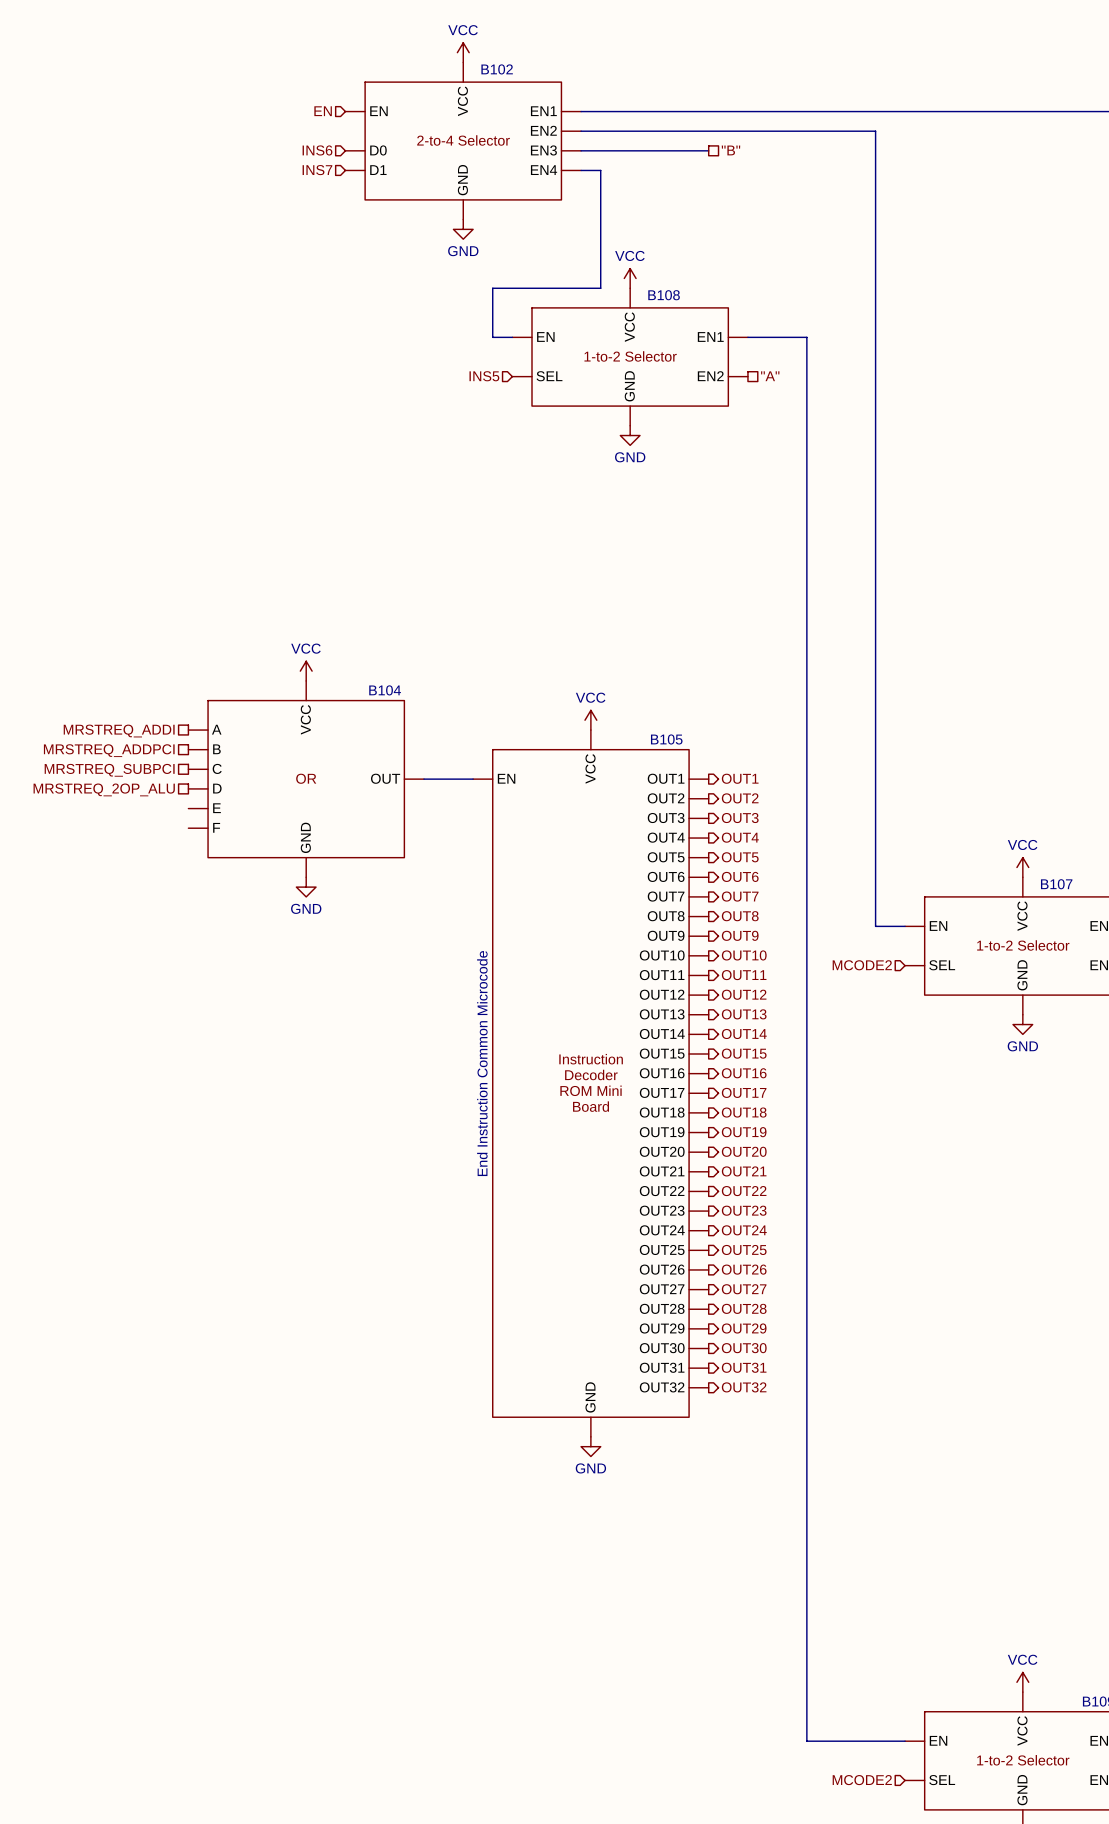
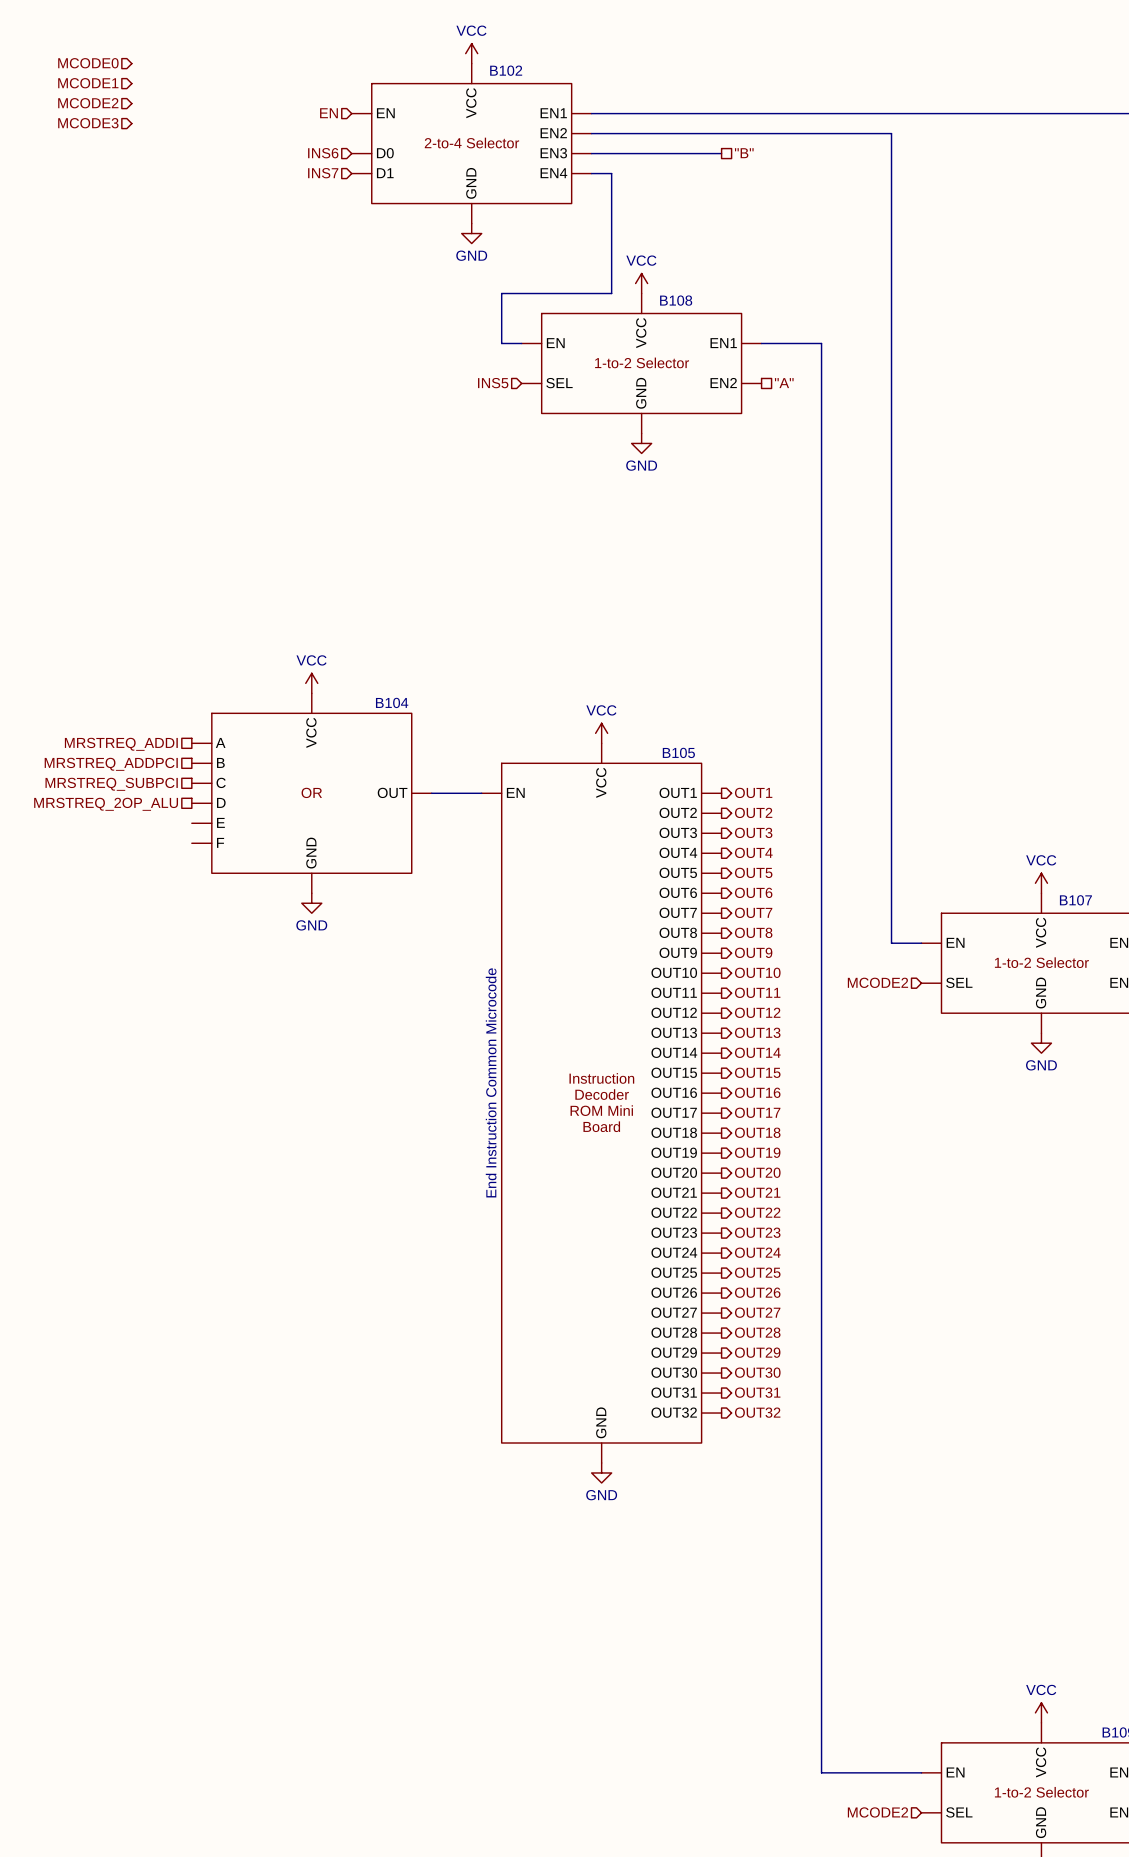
hierarchical label: none -> MCODE0 (88, 63)
hierarchical label: none -> MCODE1 (88, 83)
hierarchical label: none -> MCODE2 (88, 103)
hierarchical label: none -> MCODE3 (88, 123)

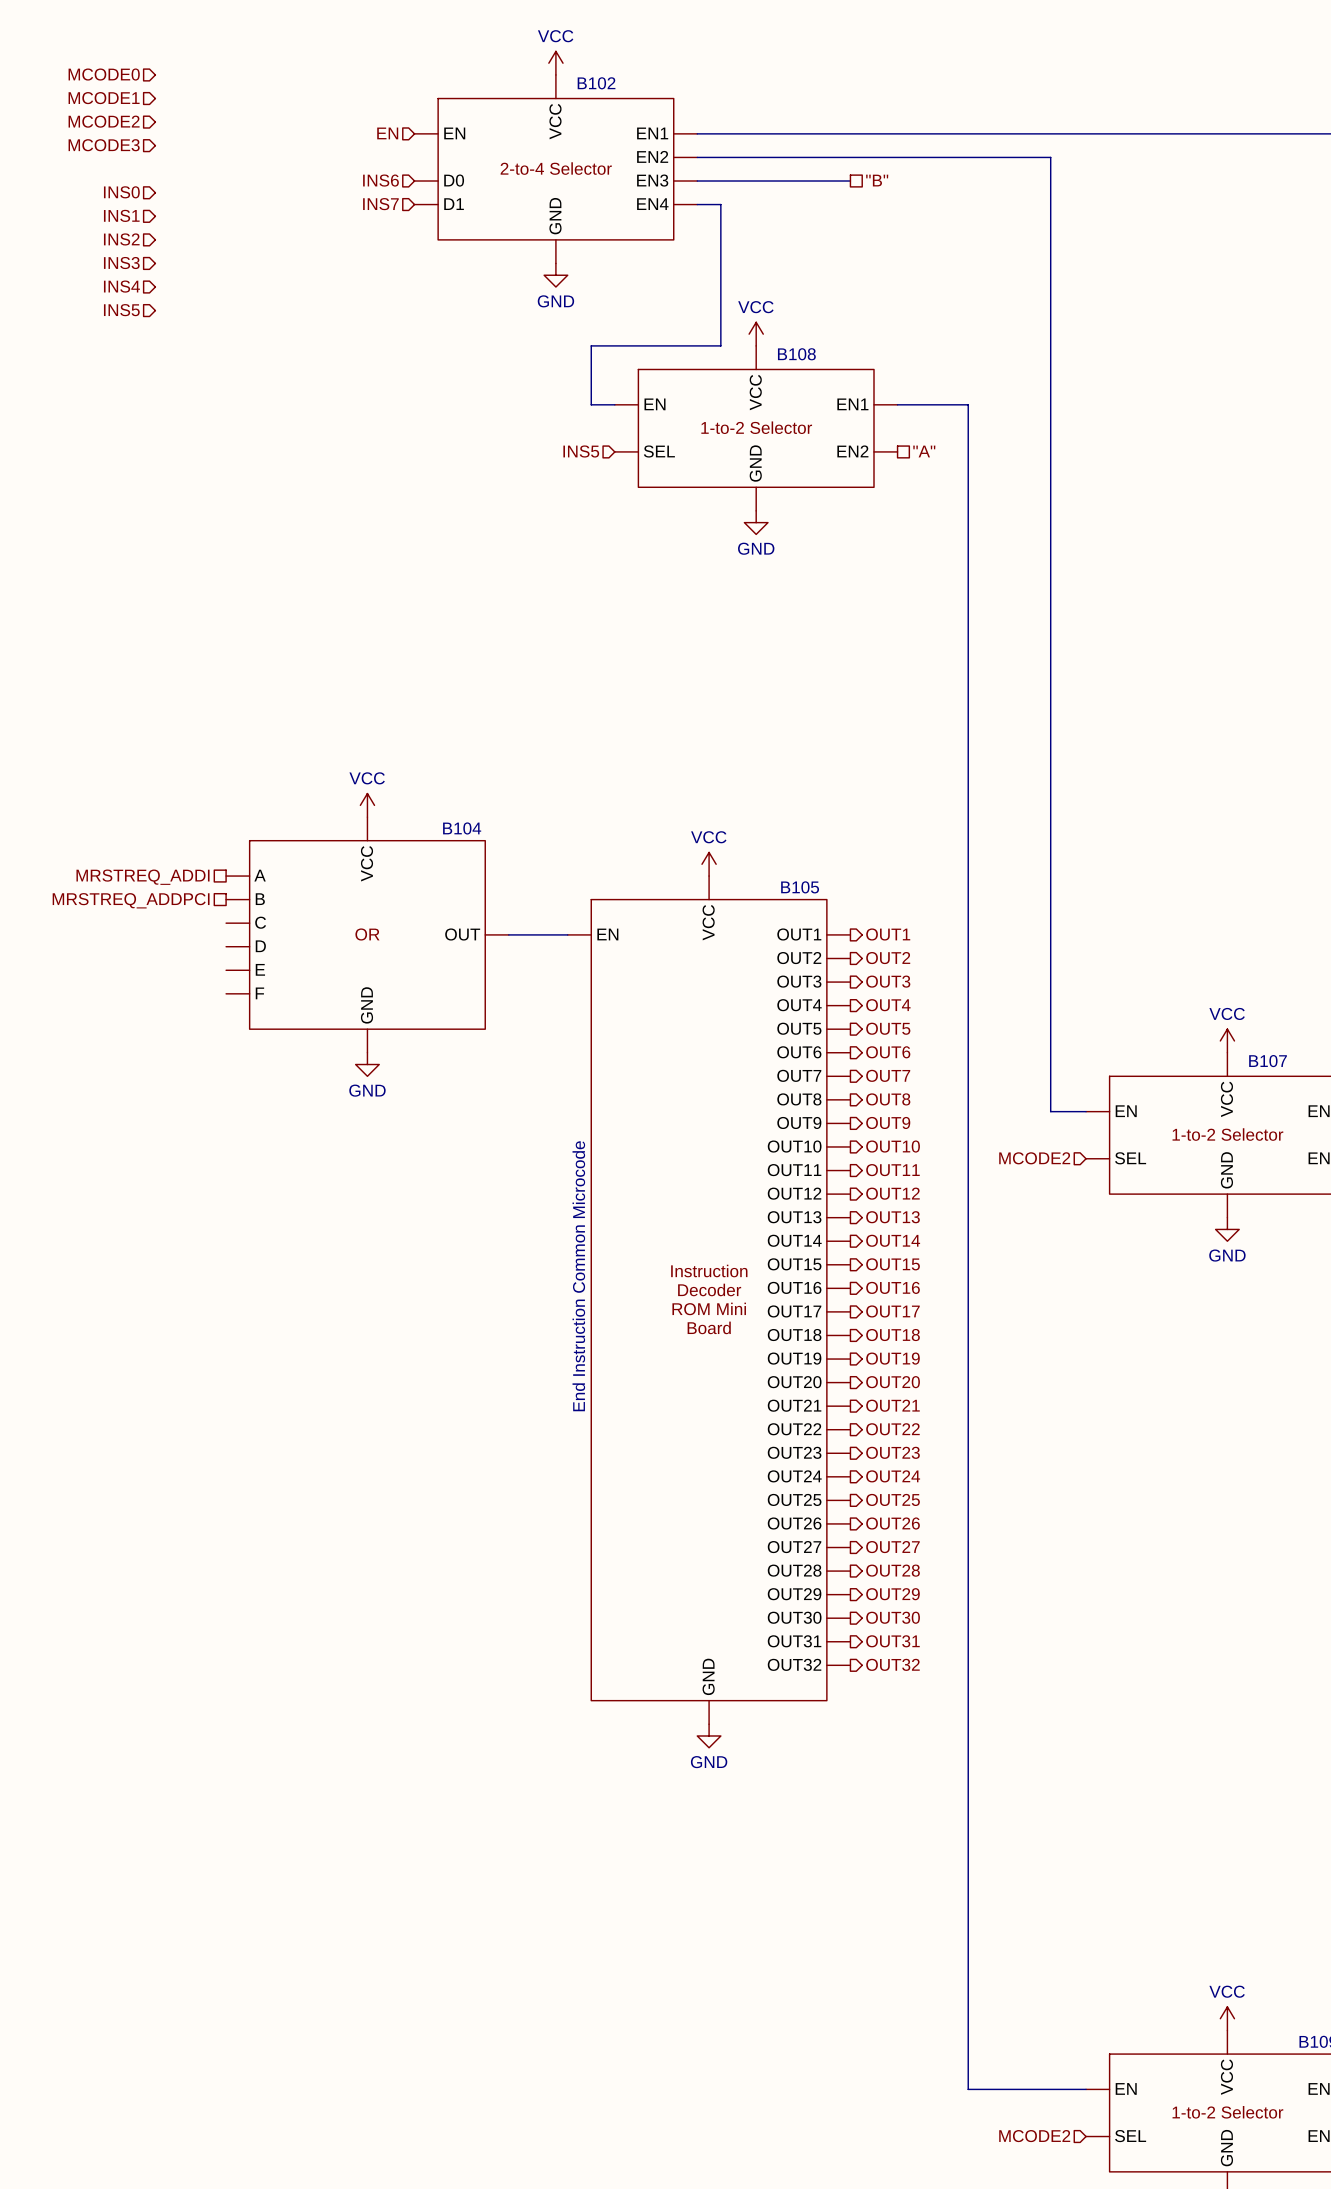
hierarchical label: none -> INS0 (121, 192)
hierarchical label: none -> INS1 (121, 215)
hierarchical label: none -> INS2 (121, 239)
hierarchical label: none -> INS3 (121, 263)
hierarchical label: none -> INS4 (121, 286)
hierarchical label: none -> INS5 (121, 310)
hierarchical label: MRSTREQ_SUBPCI (111, 784) -> none
hierarchical label: MRSTREQ_2OP_ALU (106, 804) -> none

